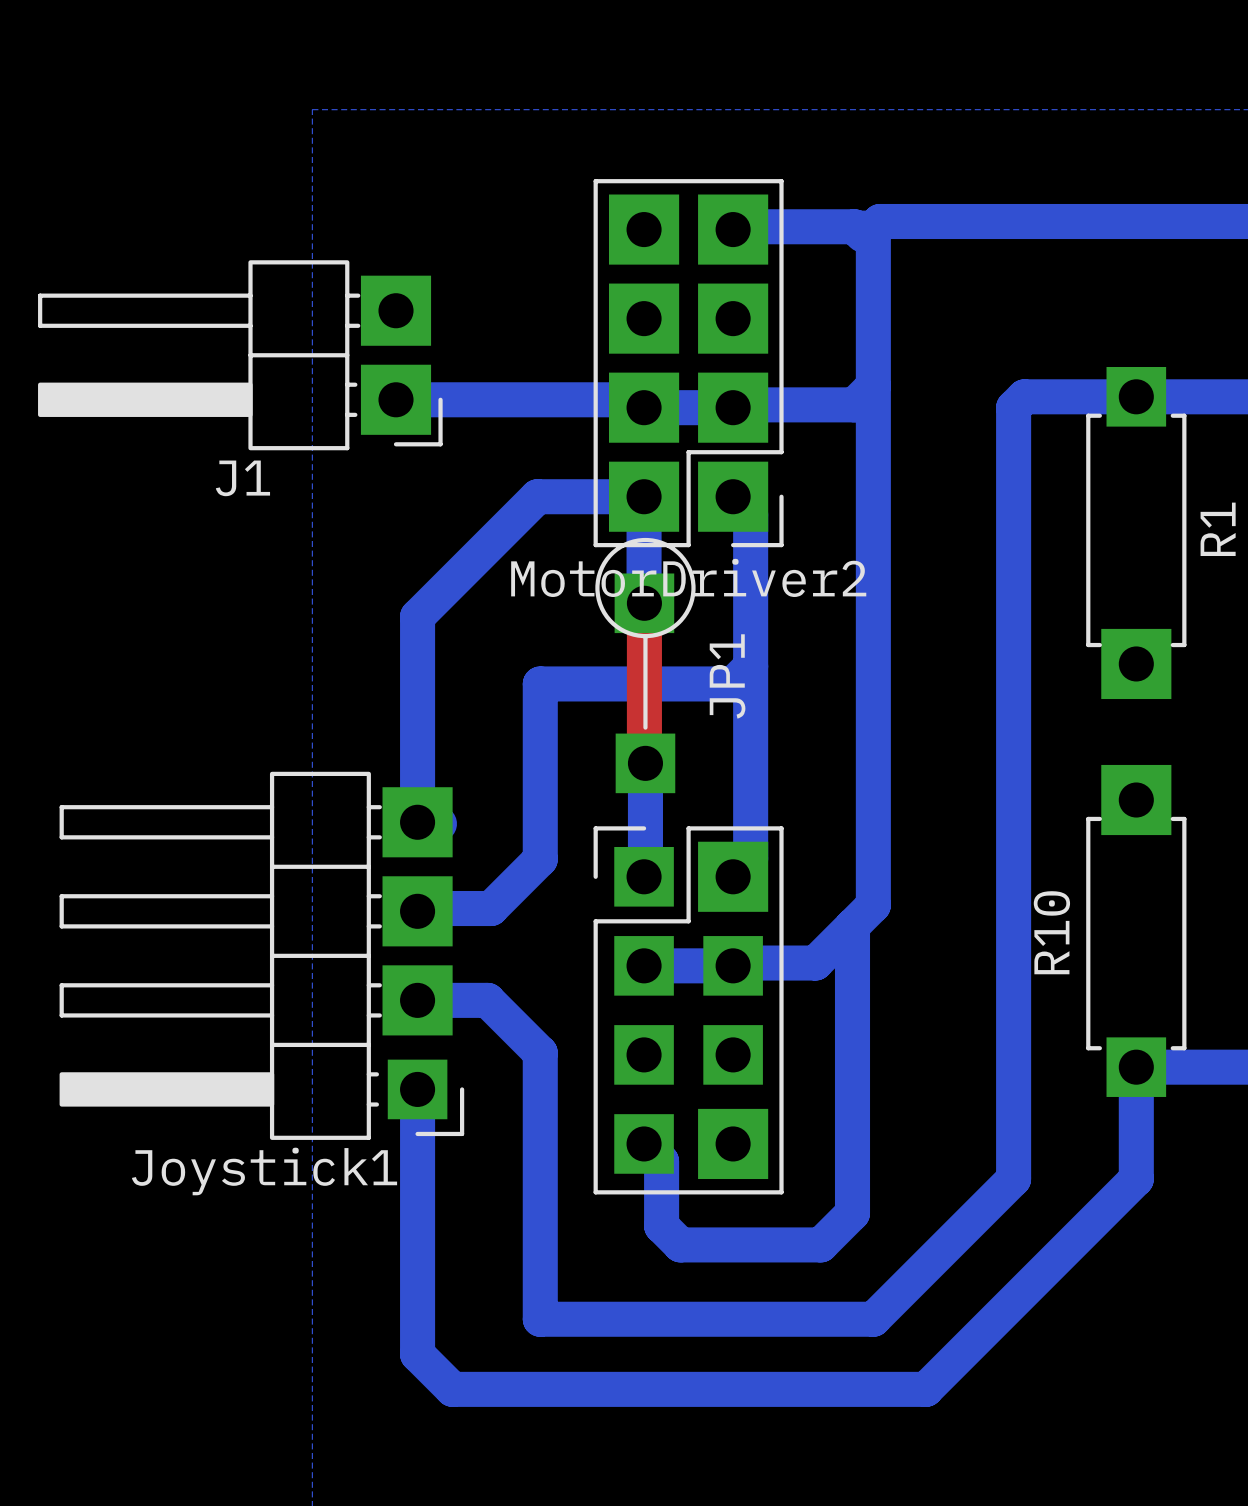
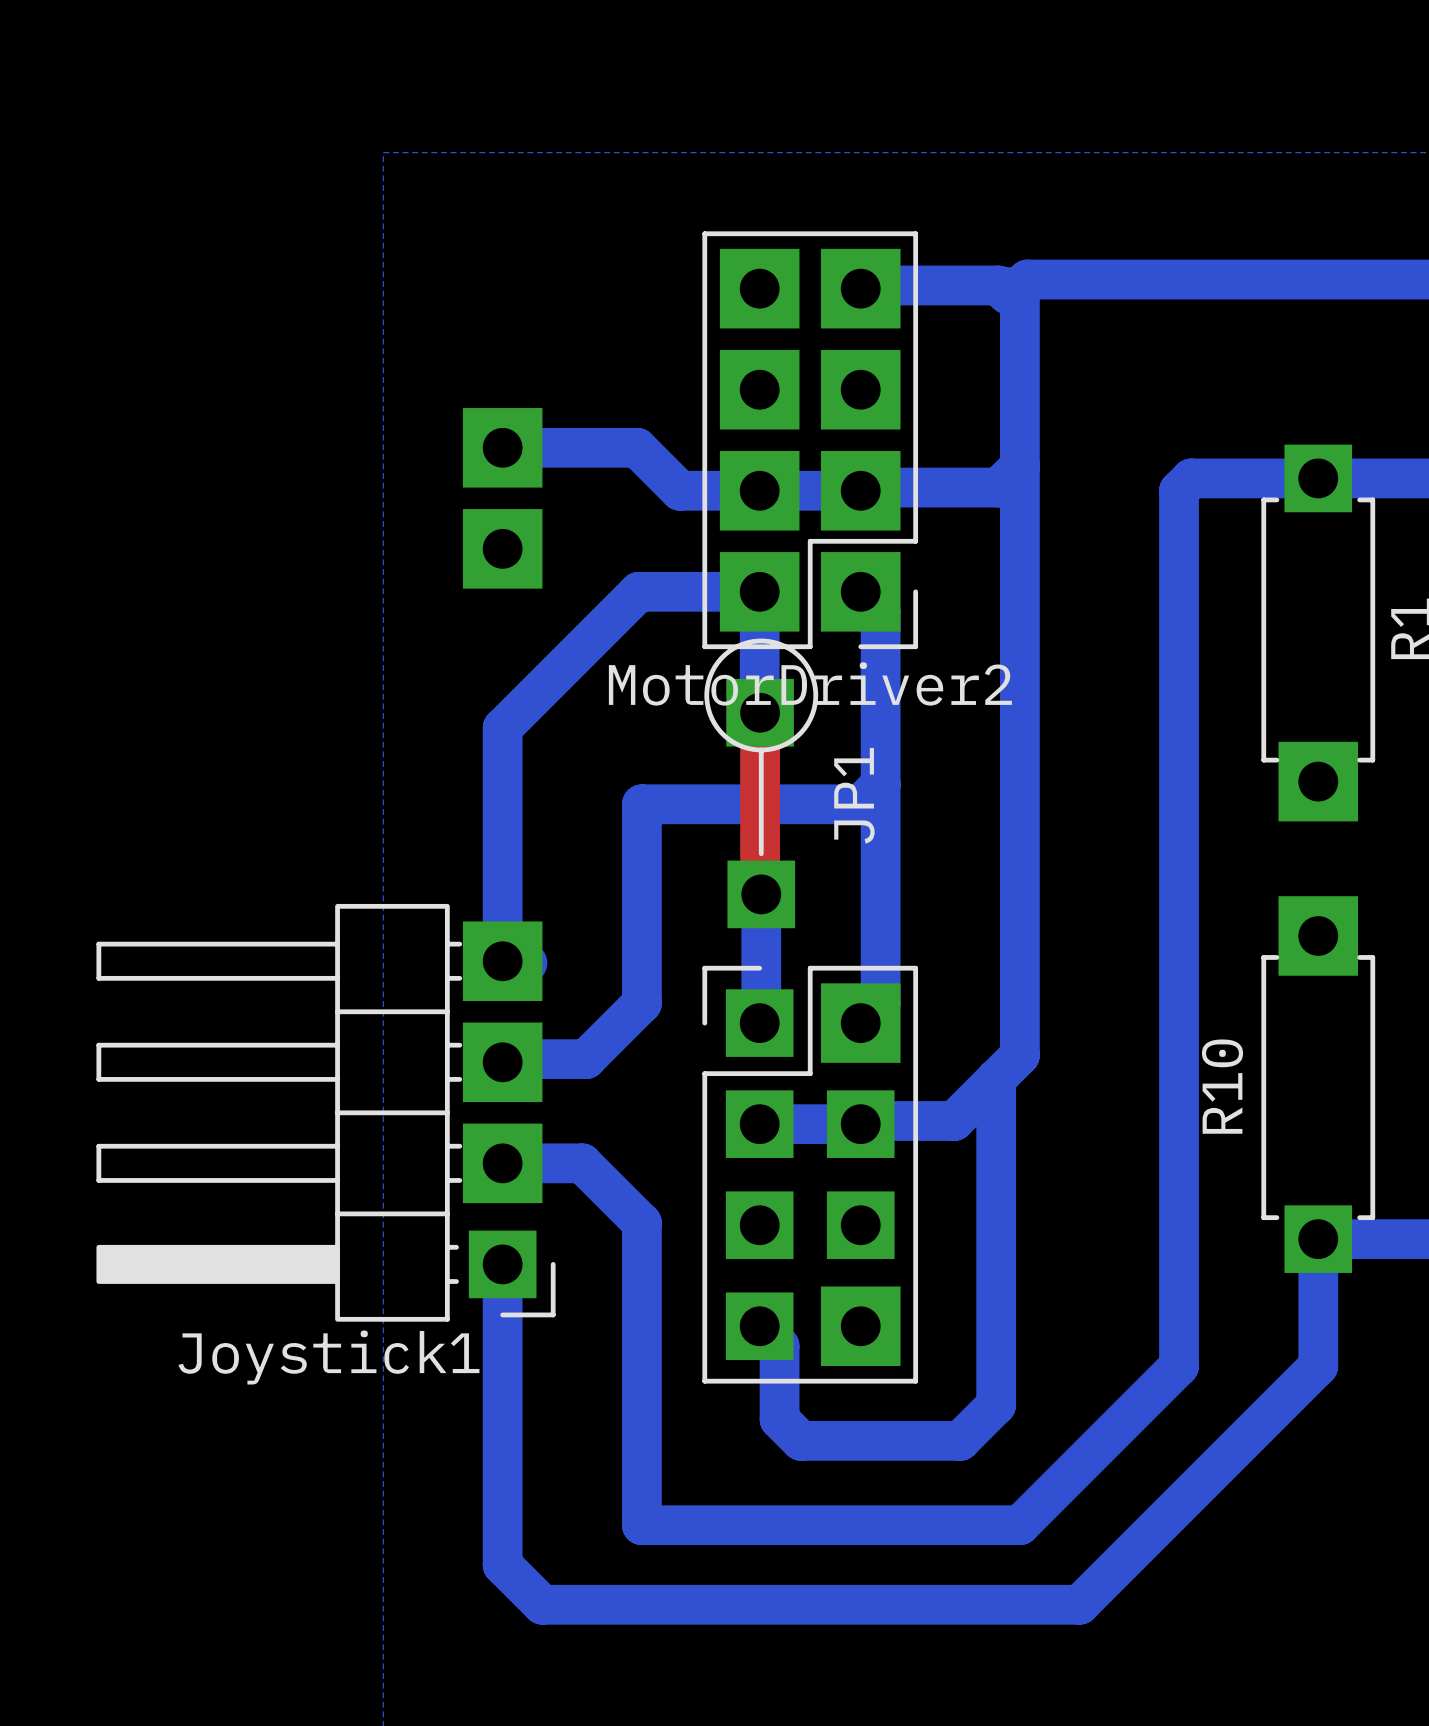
J1 side: top (240, 355) -> bottom (502, 498)
bottom track: (396, 399) (636, 399) (644, 407) -> (502, 447) (637, 447) (680, 490) (759, 490)

